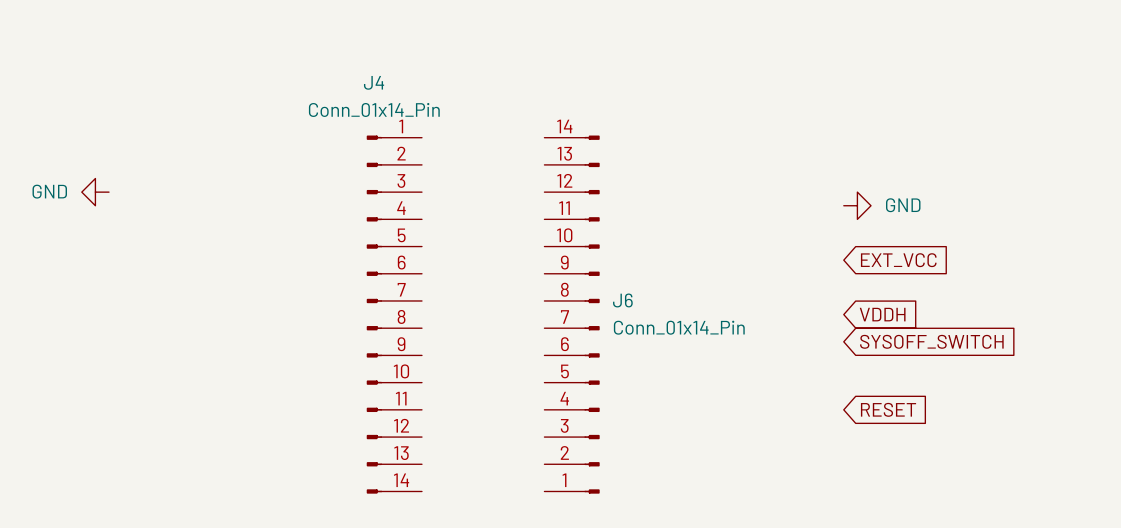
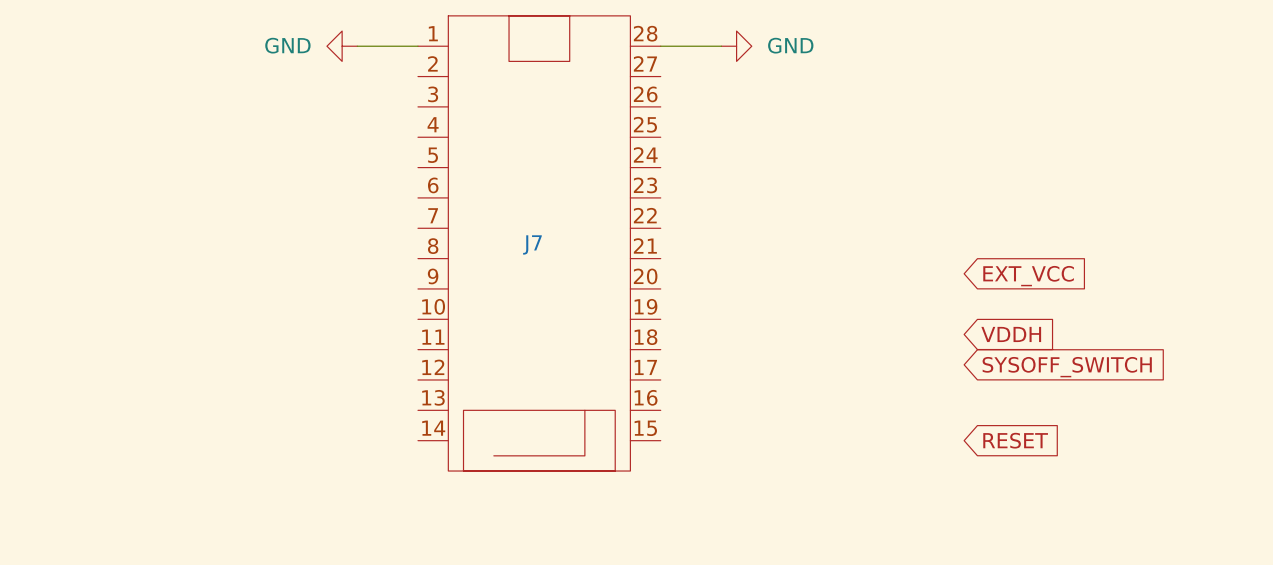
wire: none -> (357, 46) (417, 46)
wire: none -> (660, 46) (721, 46)
power symbol position: GND (95, 192) -> GND (342, 46)
power symbol position: GND (857, 205) -> GND (736, 46)
J7: none -> (539, 243)
J4: Conn_01x14_Pin (394, 314) -> none
J6: Conn_01x14_Pin (572, 314) -> none

